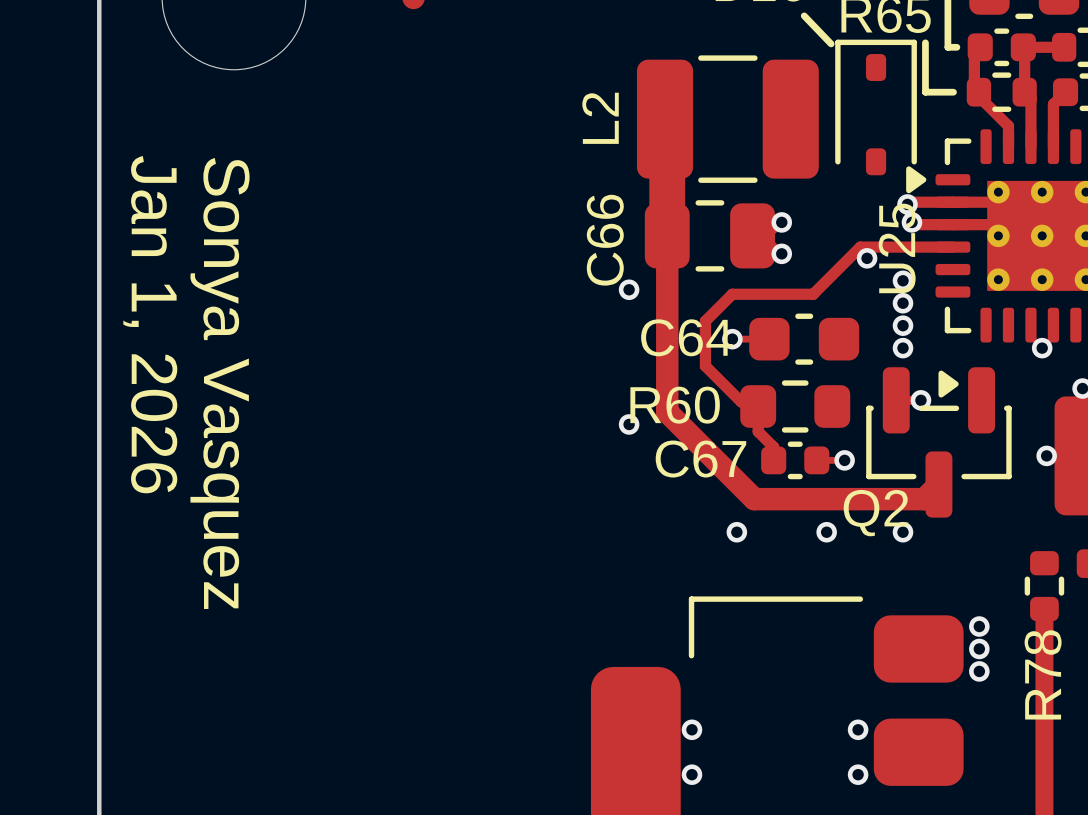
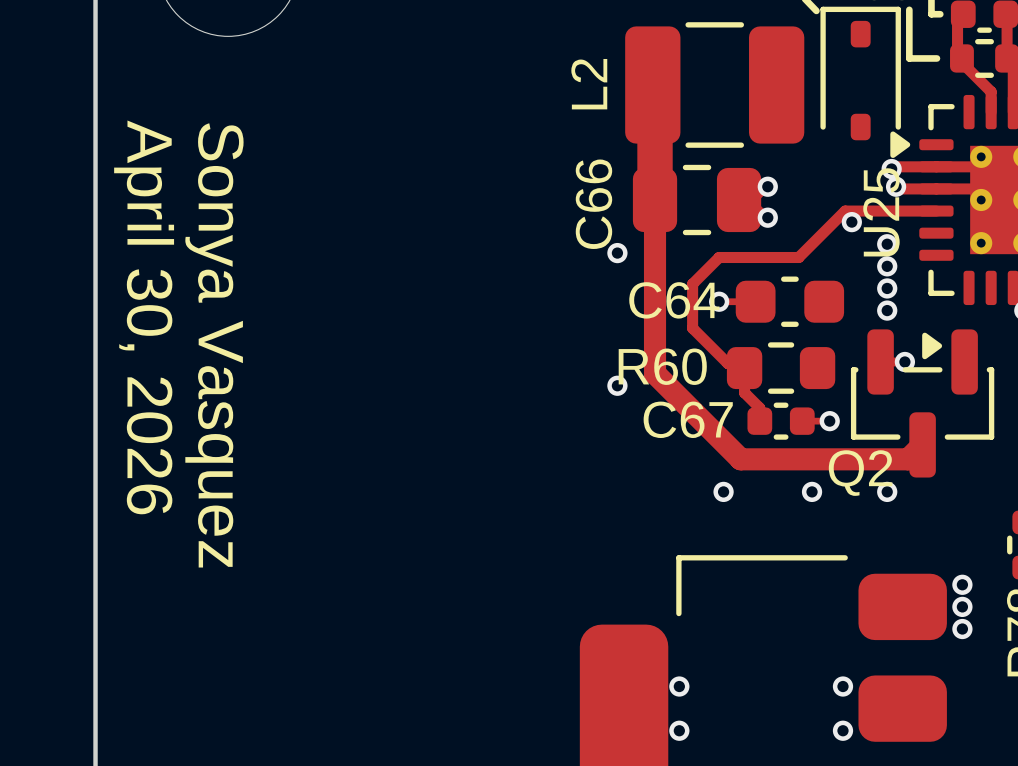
text: Jan 1, 2026 (150, 324) -> April 30, 2026 (144, 317)

